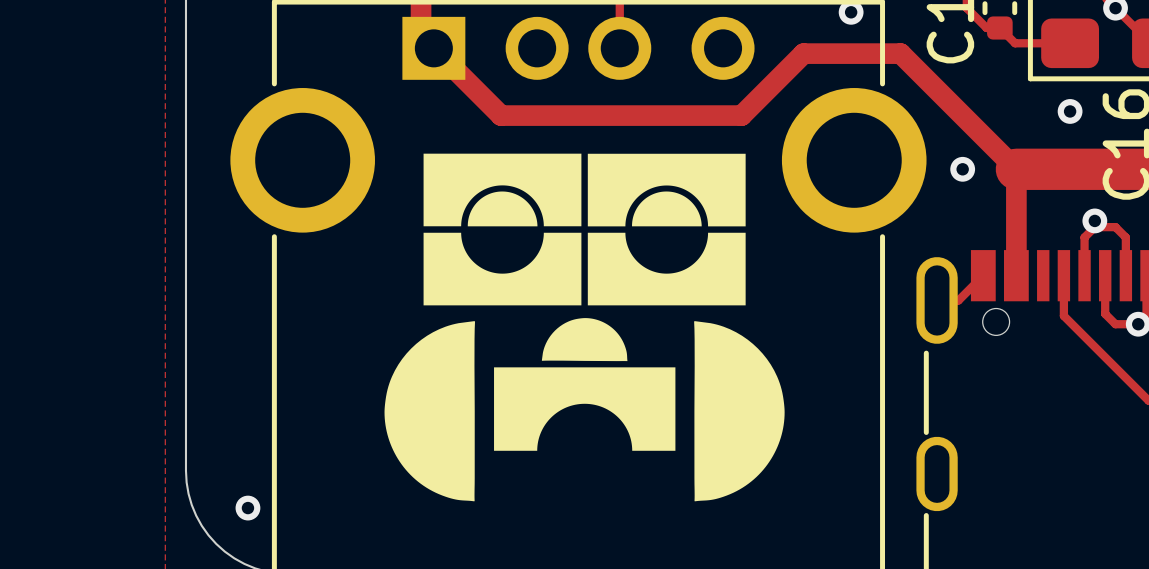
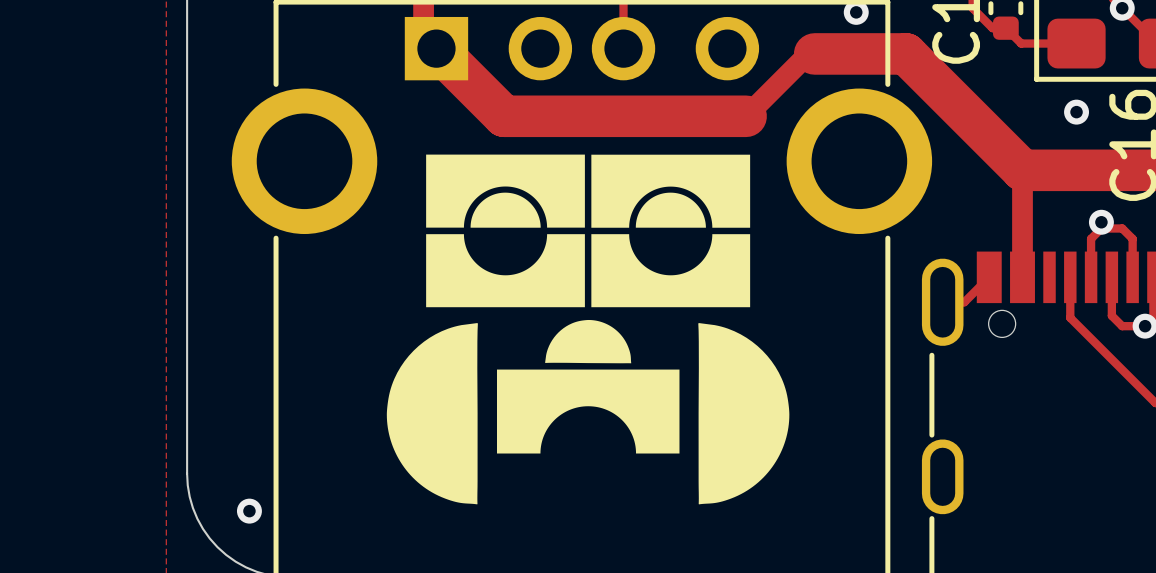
track width: thin (433, 48) (501, 115) (741, 115) -> thick (436, 48) (504, 116) (746, 116)
track width: thin (809, 53) (900, 53) (1016, 169) -> thick (814, 53) (906, 53) (1022, 170)
via: (962, 169) -> none

